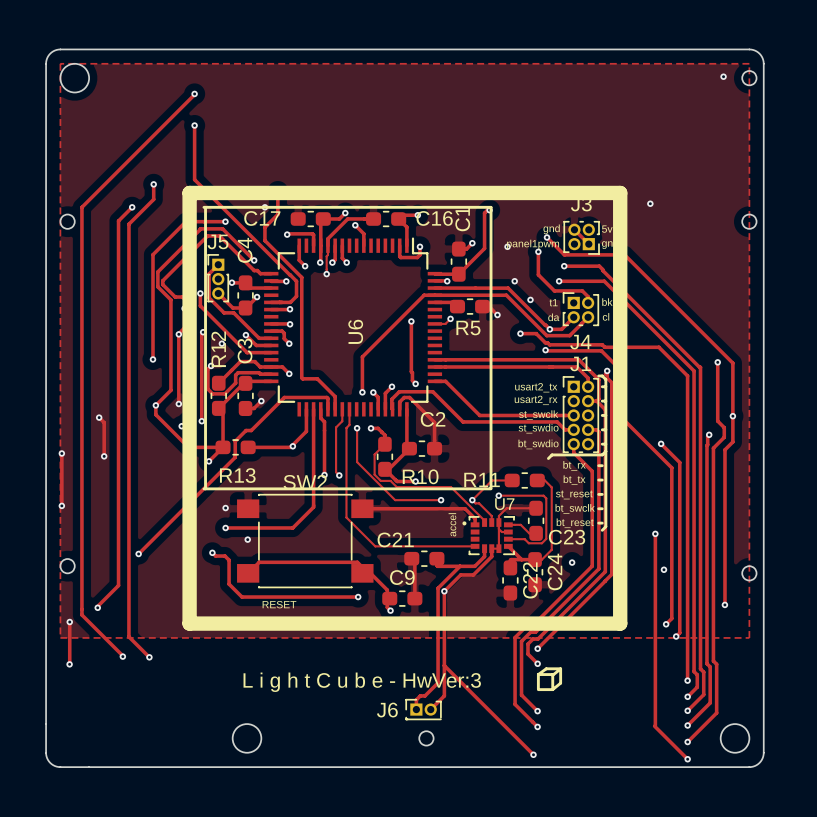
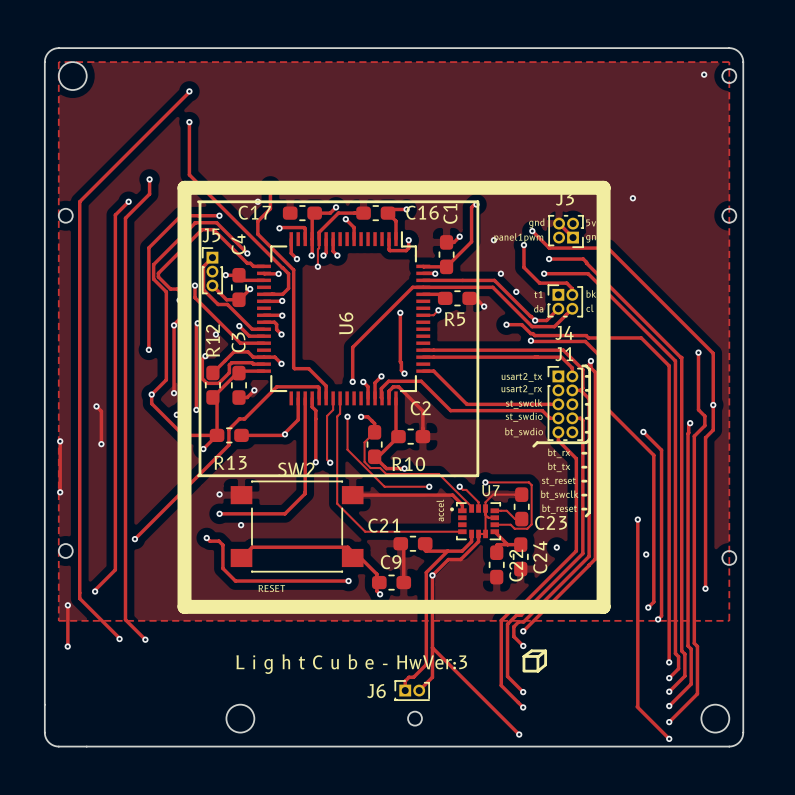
track: (512, 480) (492, 480) (472, 500) -> none
R11: (524, 480) -> none
track: (537, 480) (544, 480) (551, 487) (551, 549) (541, 559) (535, 559) -> none

